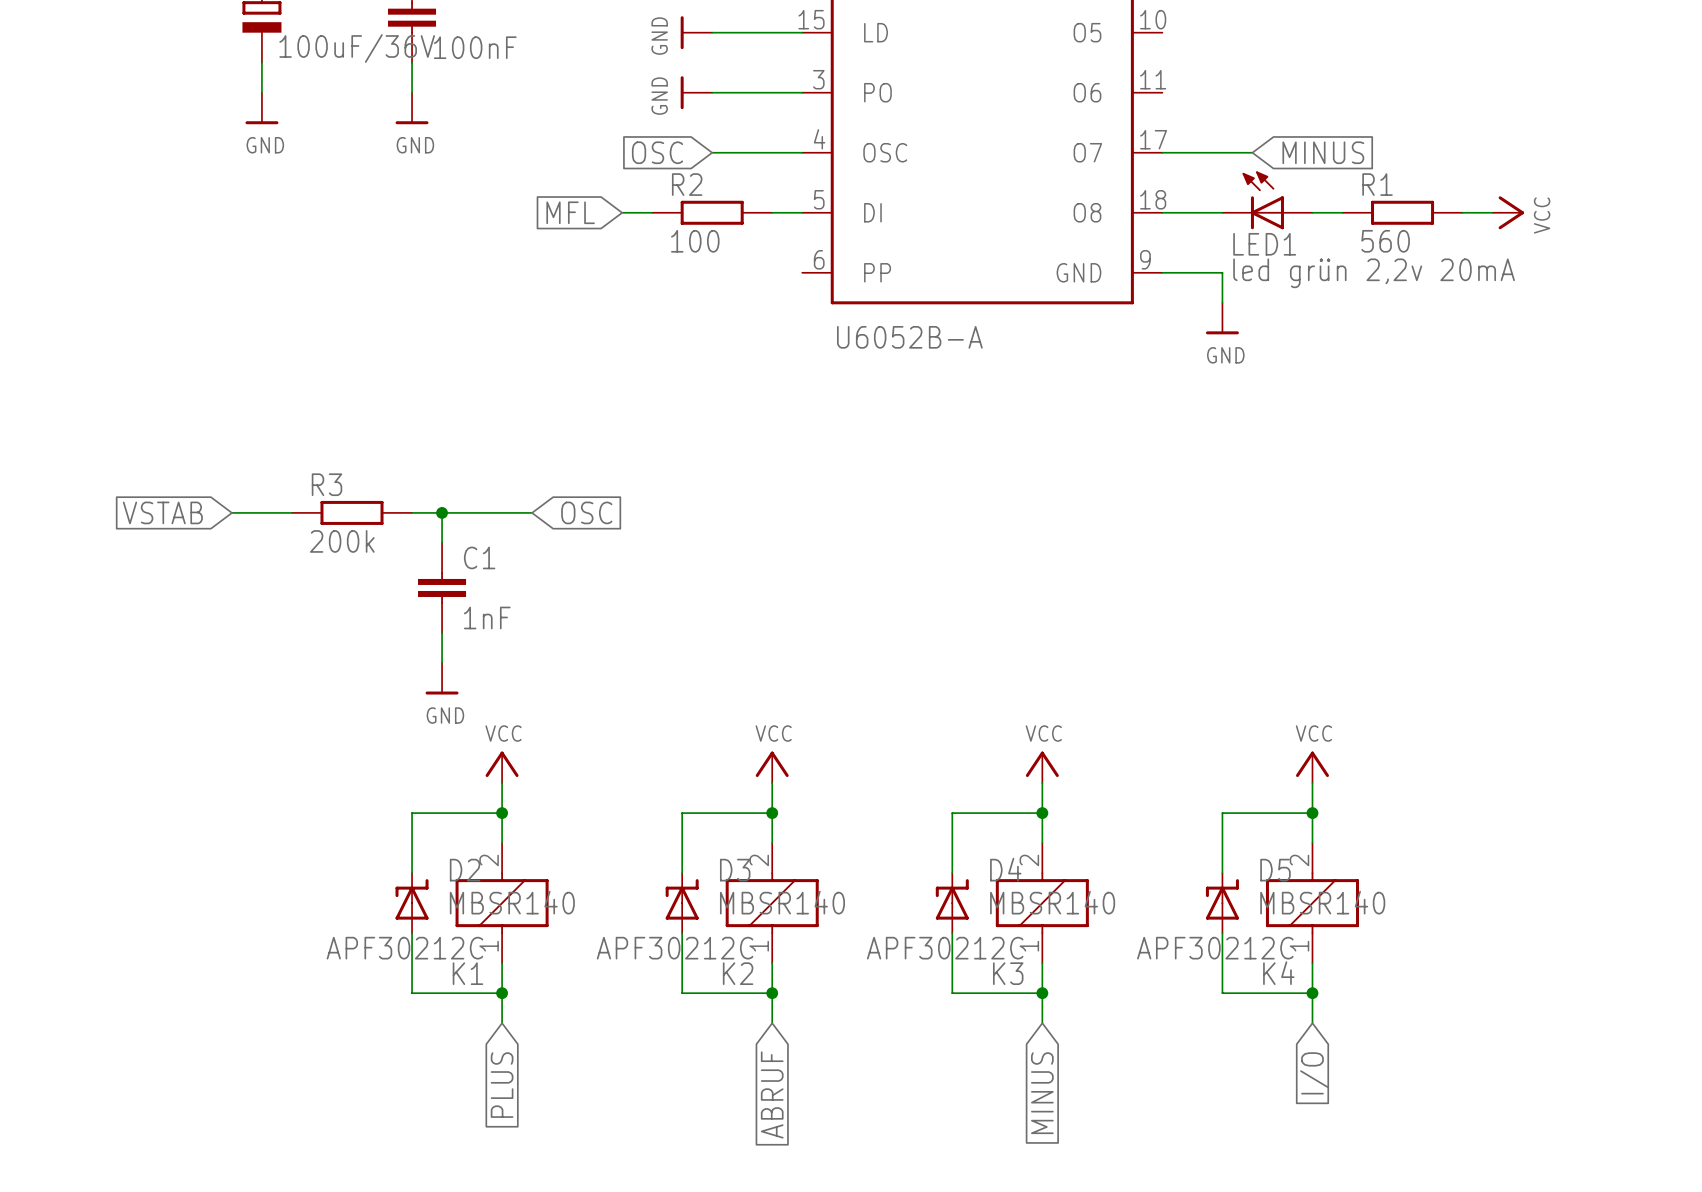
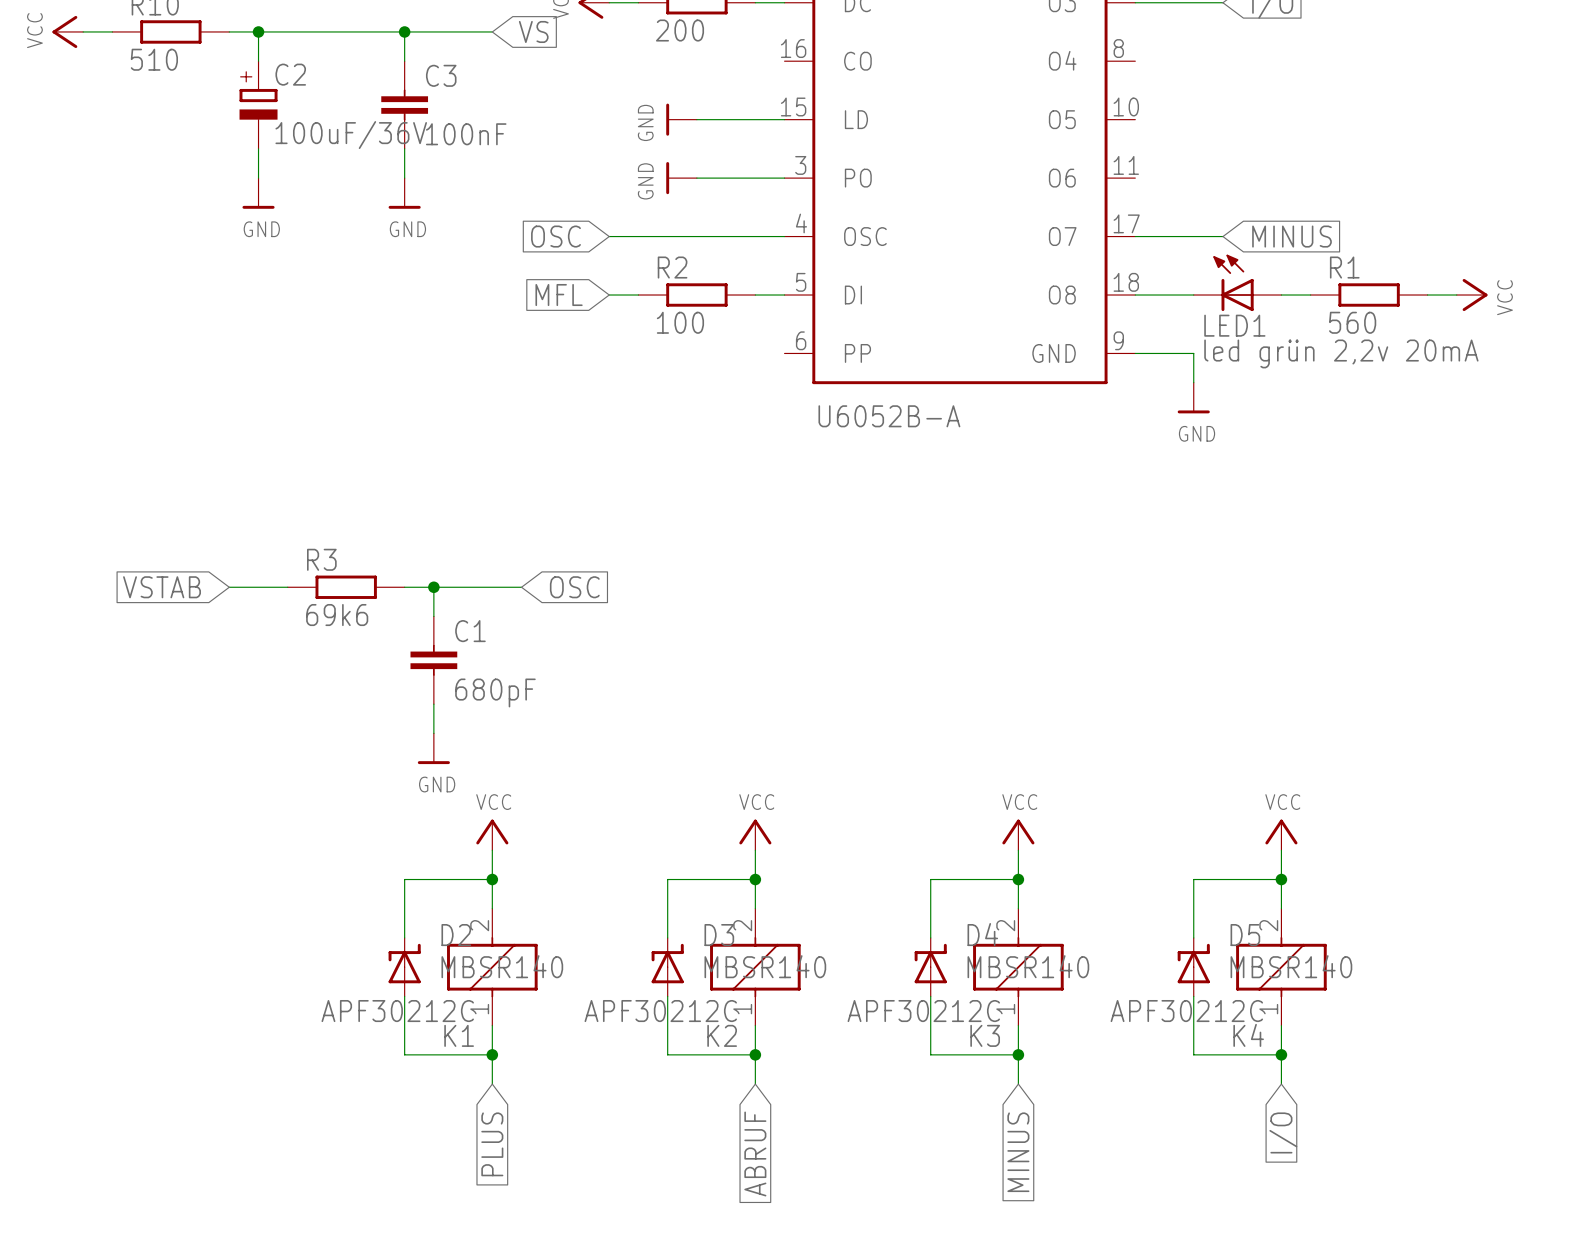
wire: none -> (609, 236) (696, 236)
global label position: OSC (657, 152) -> OSC (555, 236)
R3 value: 200k (342, 541) -> 69k6 (337, 615)
C1 value: 1nF (487, 617) -> 680pF (495, 692)

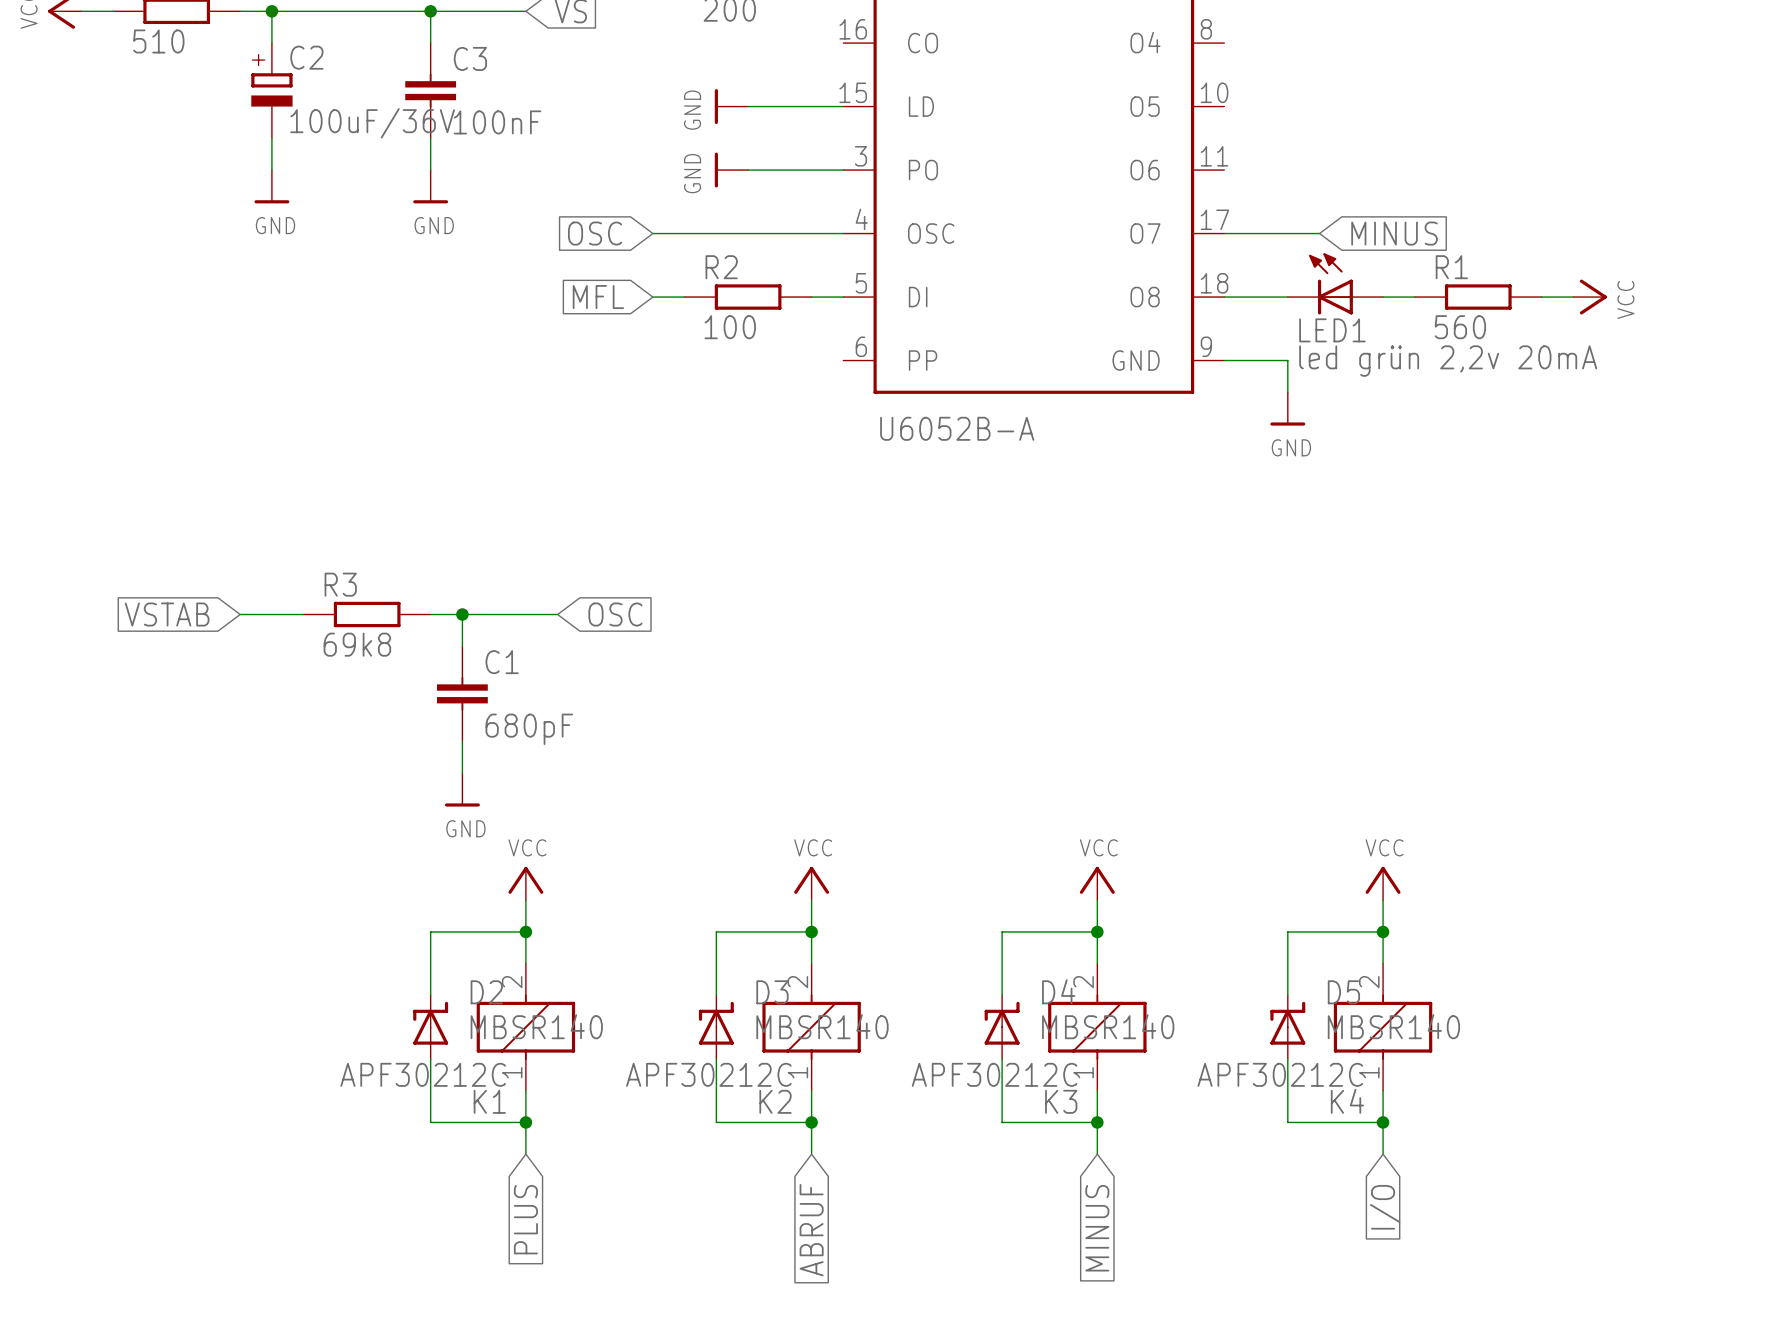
R3 value: 69k6 (337, 615) -> 69k8 (357, 644)

